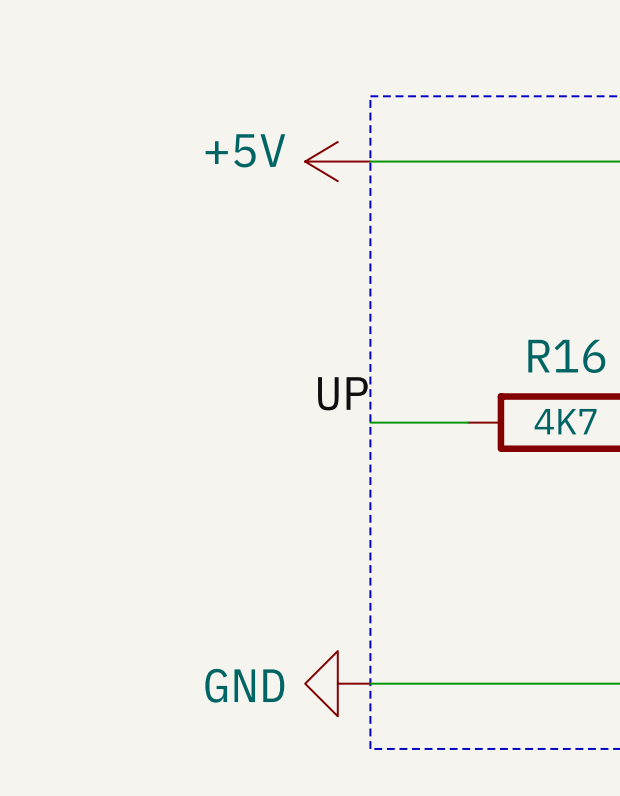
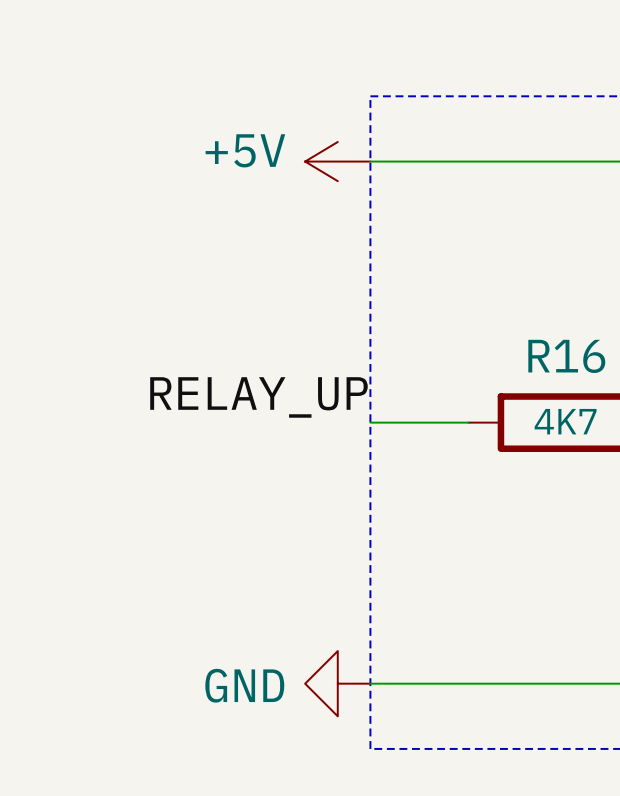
label: UP (342, 393) -> RELAY_UP (258, 397)

